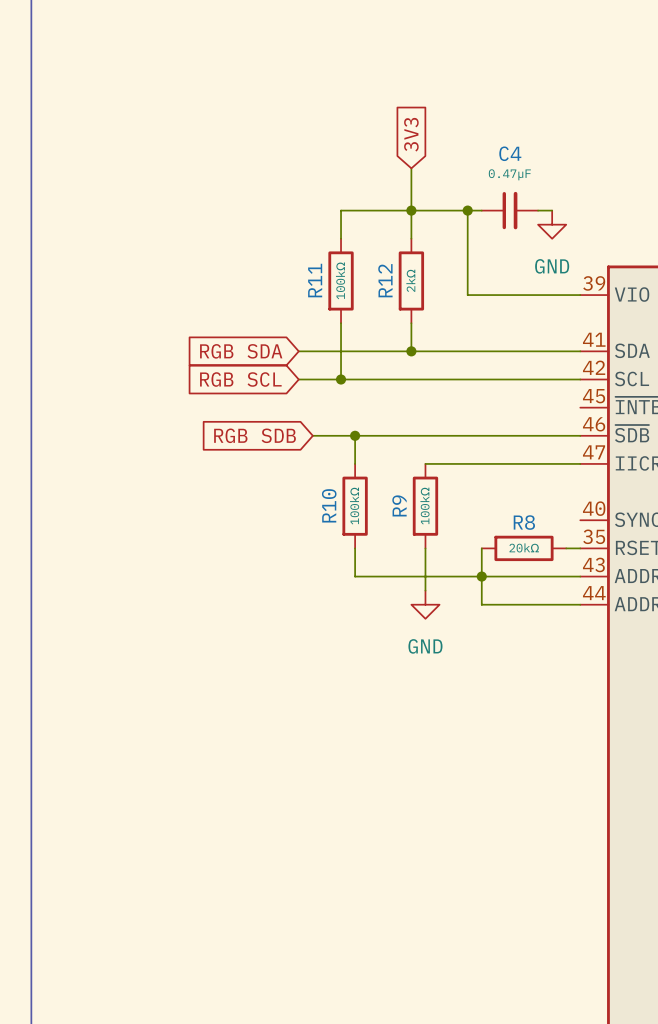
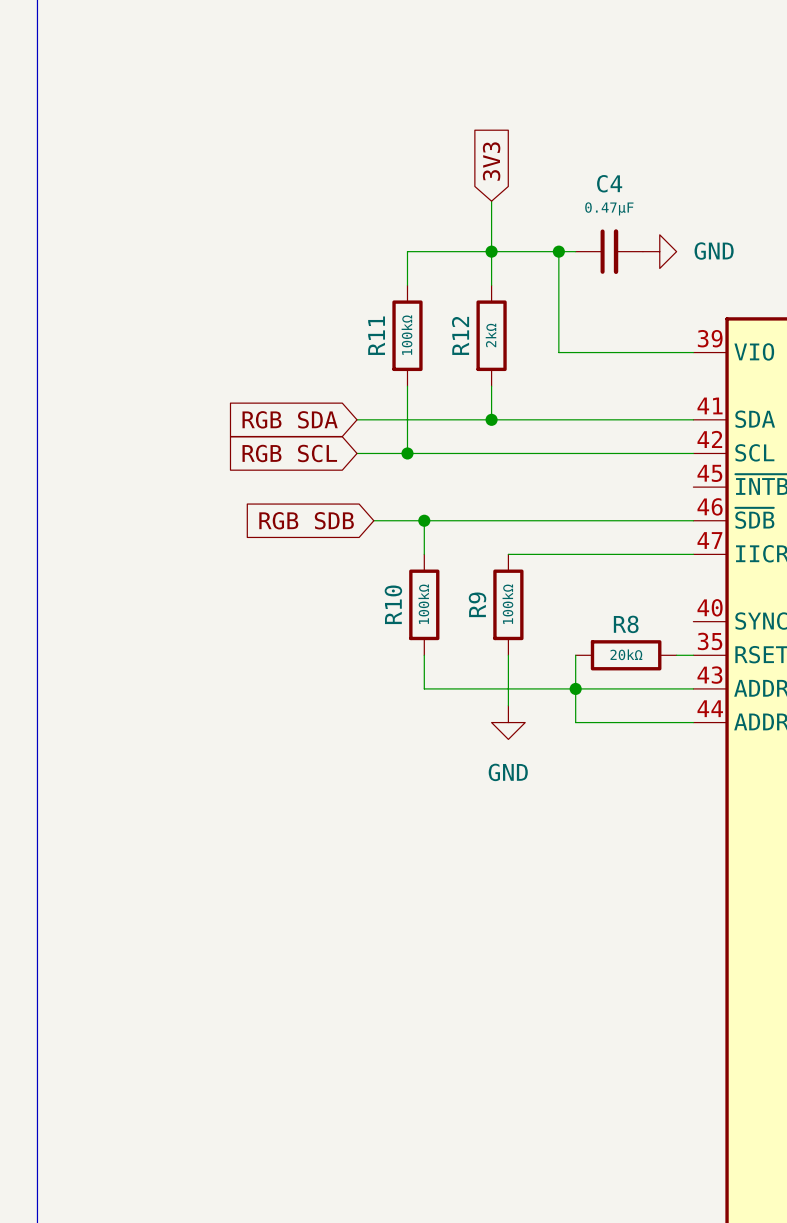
power symbol rotation: 0° (552, 224) -> 90° counterclockwise (659, 251)

